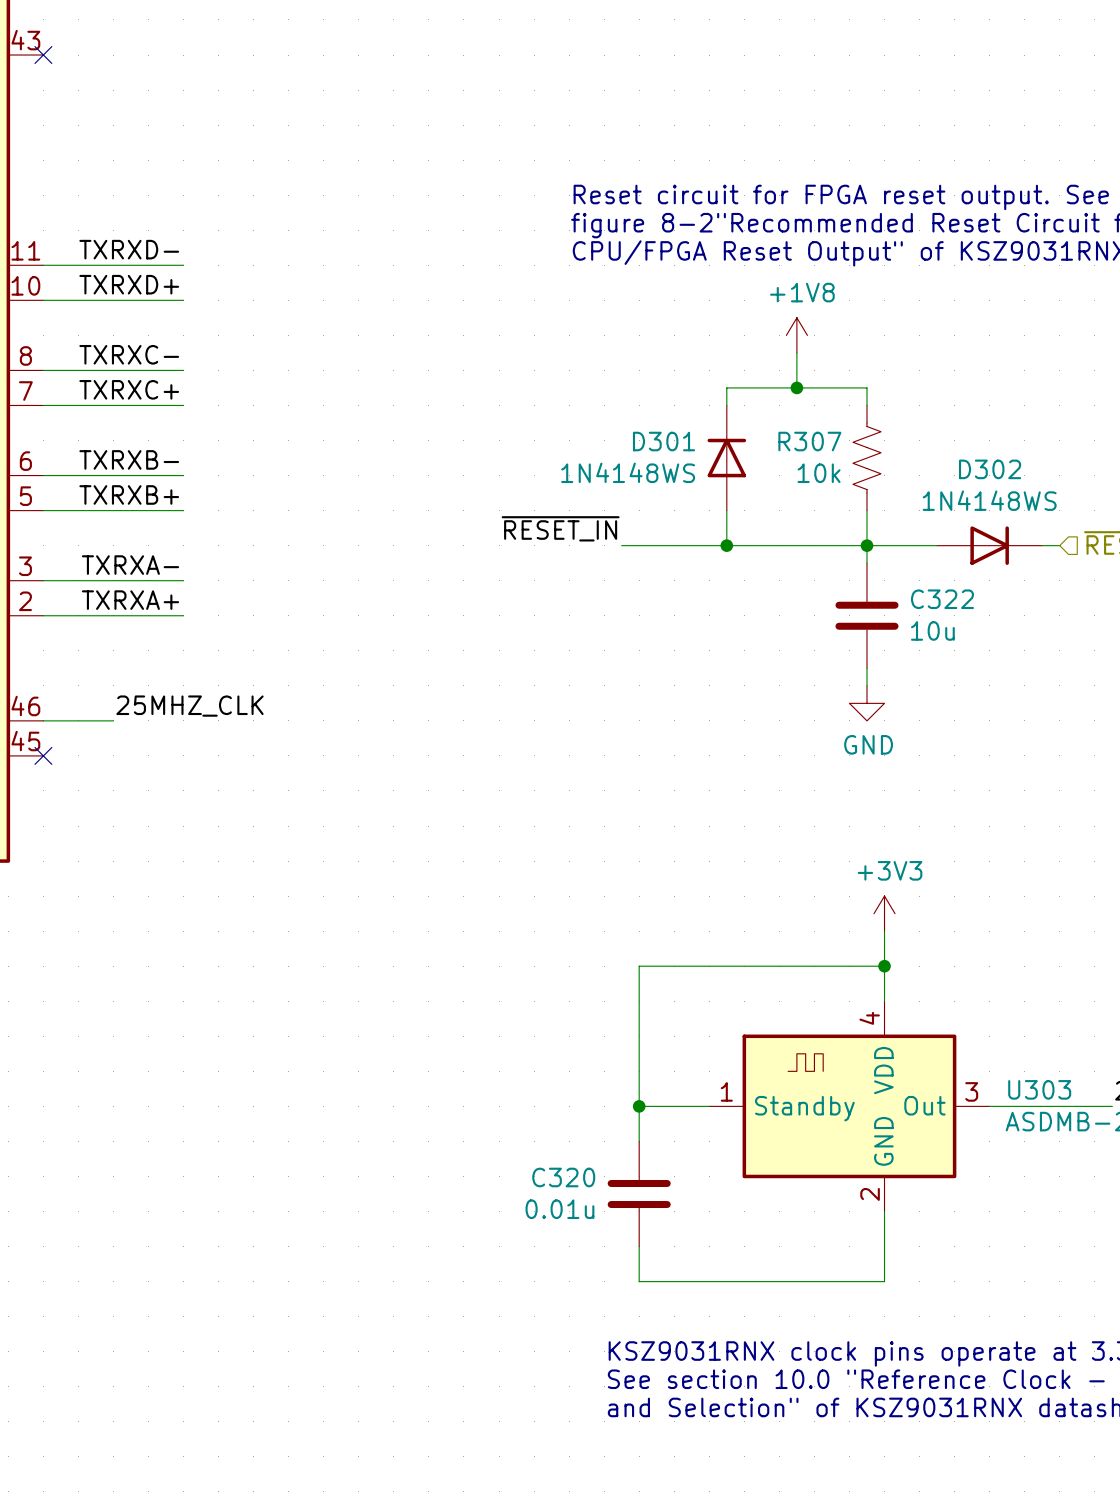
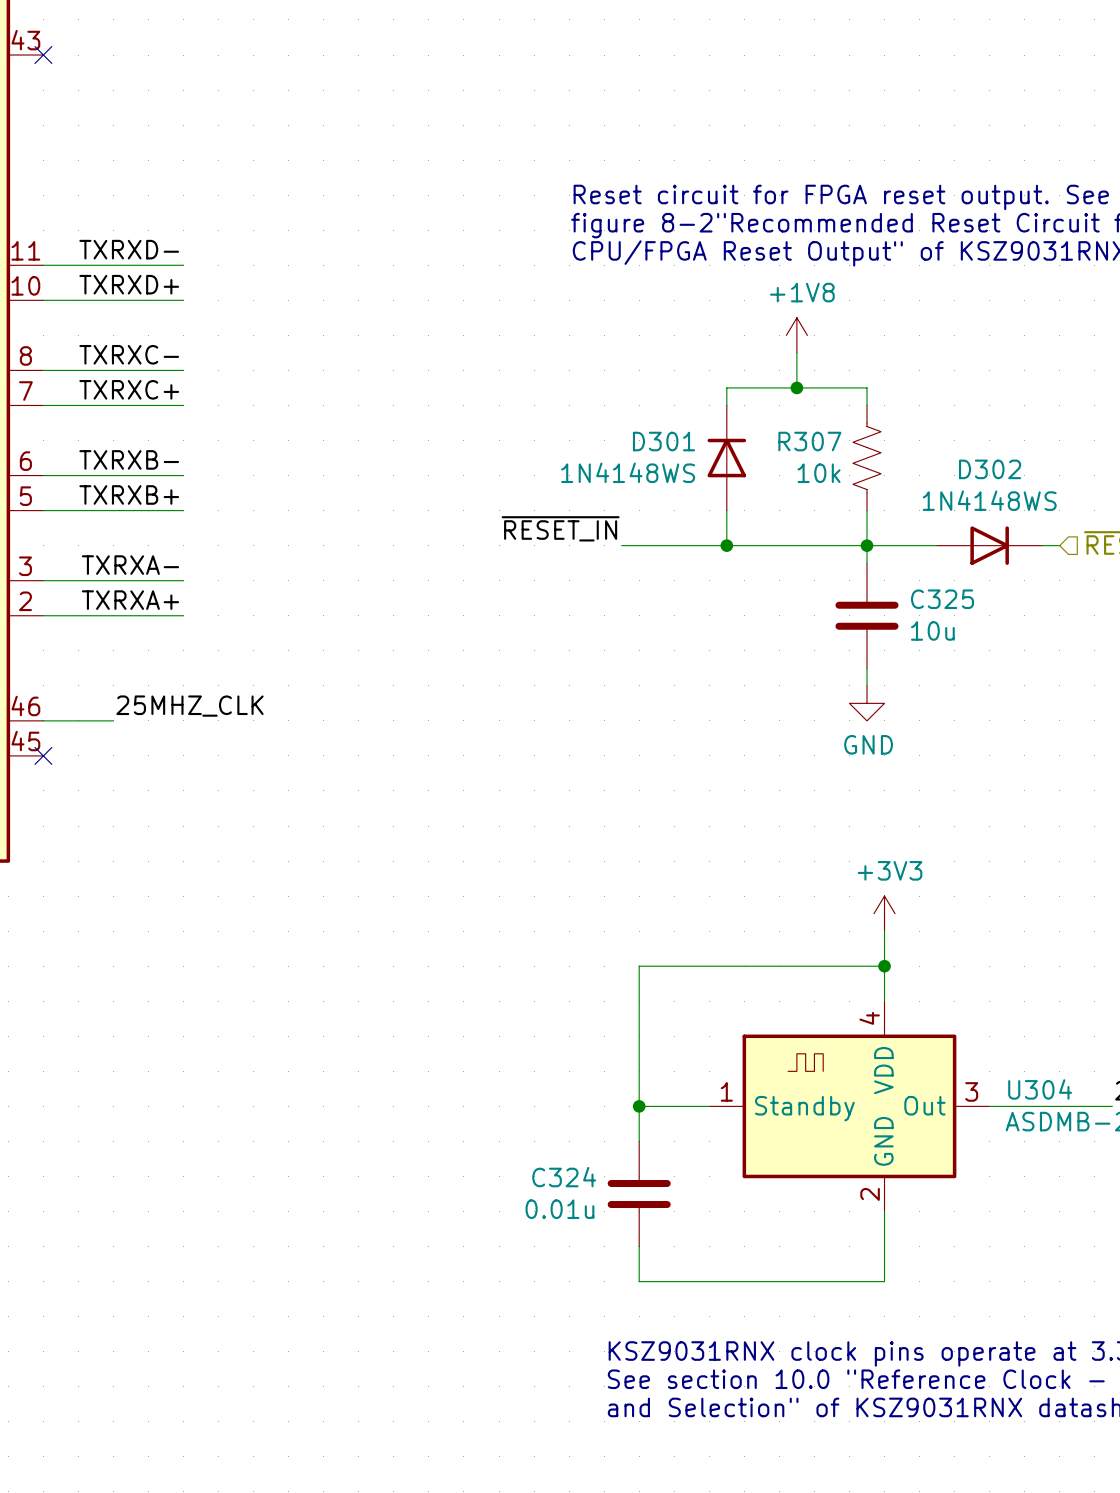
C322 name: C322 (942, 599) -> C325 (942, 599)
U303 name: U303 (1039, 1089) -> U304 (1040, 1089)
C320 name: C320 (563, 1177) -> C324 (564, 1177)

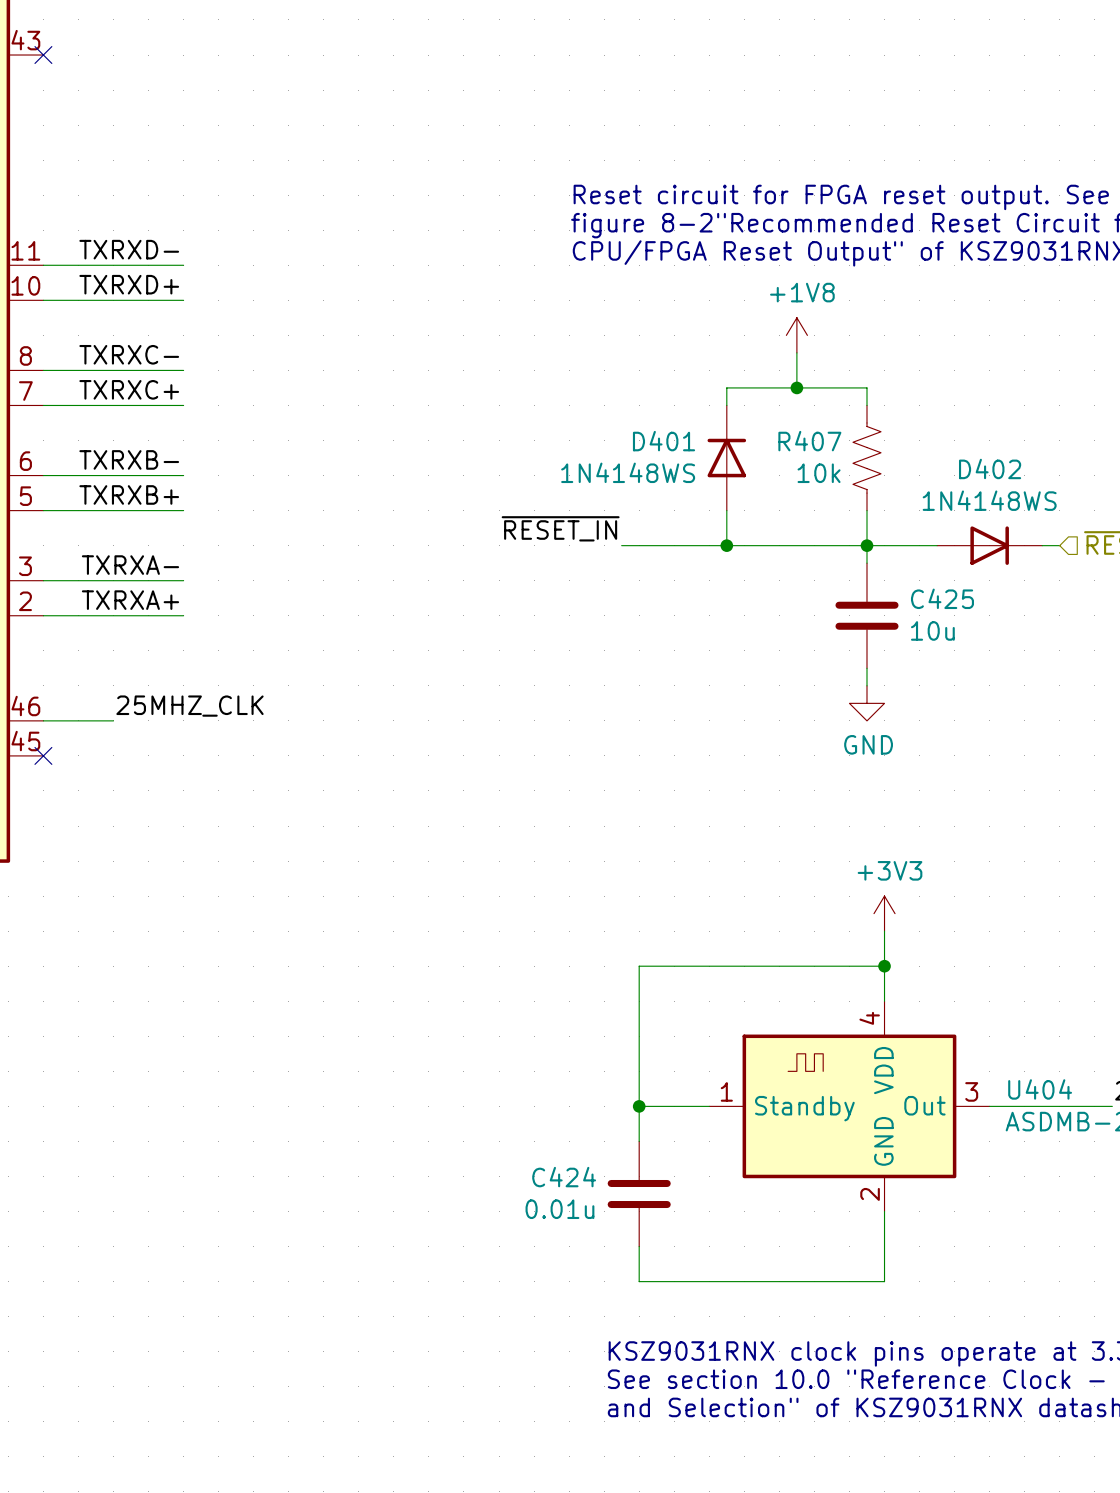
D301 name: D301 (664, 441) -> D401 (664, 441)
R307 name: R307 (809, 441) -> R407 (809, 441)
D302 name: D302 (990, 469) -> D402 (990, 468)
C325 name: C325 (942, 599) -> C425 (942, 598)
U304 name: U304 (1040, 1089) -> U404 (1040, 1089)
C324 name: C324 (564, 1177) -> C424 (564, 1177)

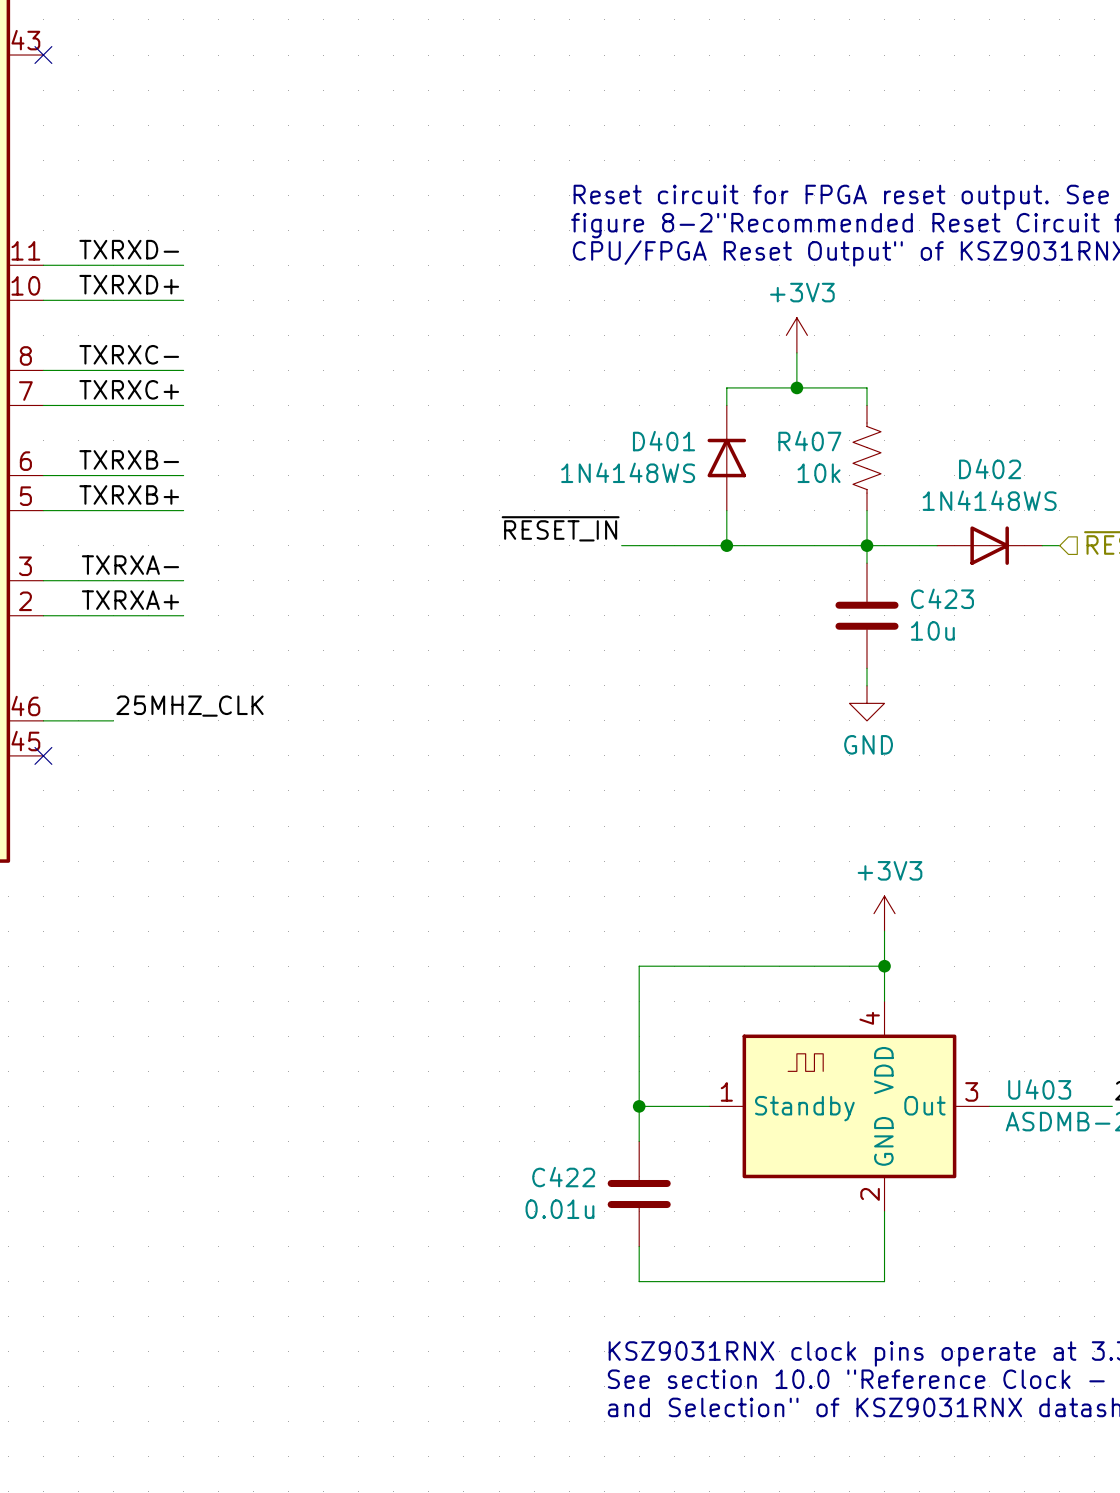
power symbol: +1V8 (796, 335) -> +3V3 (796, 335)
C425 name: C425 (942, 598) -> C423 (942, 598)
U404 name: U404 (1040, 1089) -> U403 (1039, 1089)
C424 name: C424 (564, 1177) -> C422 (563, 1177)

